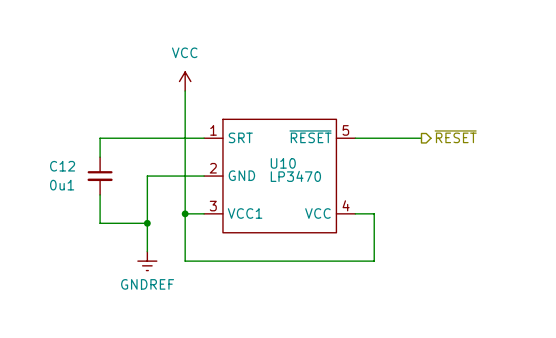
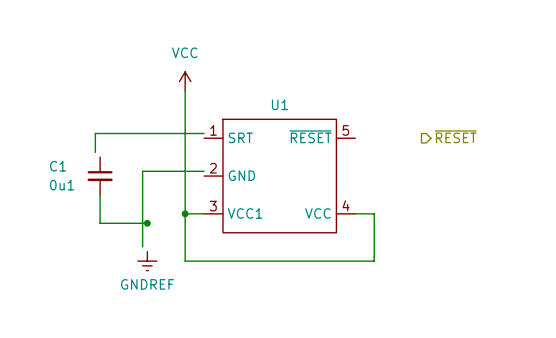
wire: none -> (204, 133) (95, 133) (95, 152)
wire: (204, 138) (100, 138) (100, 157) -> none
wire: (355, 138) (421, 138) -> none
U10 name: U10 (283, 163) -> U1 (279, 104)
C12 name: C12 (62, 166) -> C1 (58, 166)
wire: none -> (204, 171) (142, 171) (142, 246)
wire: (204, 176) (147, 176) (147, 251) -> none
U10 value: LP3470 (295, 176) -> none

